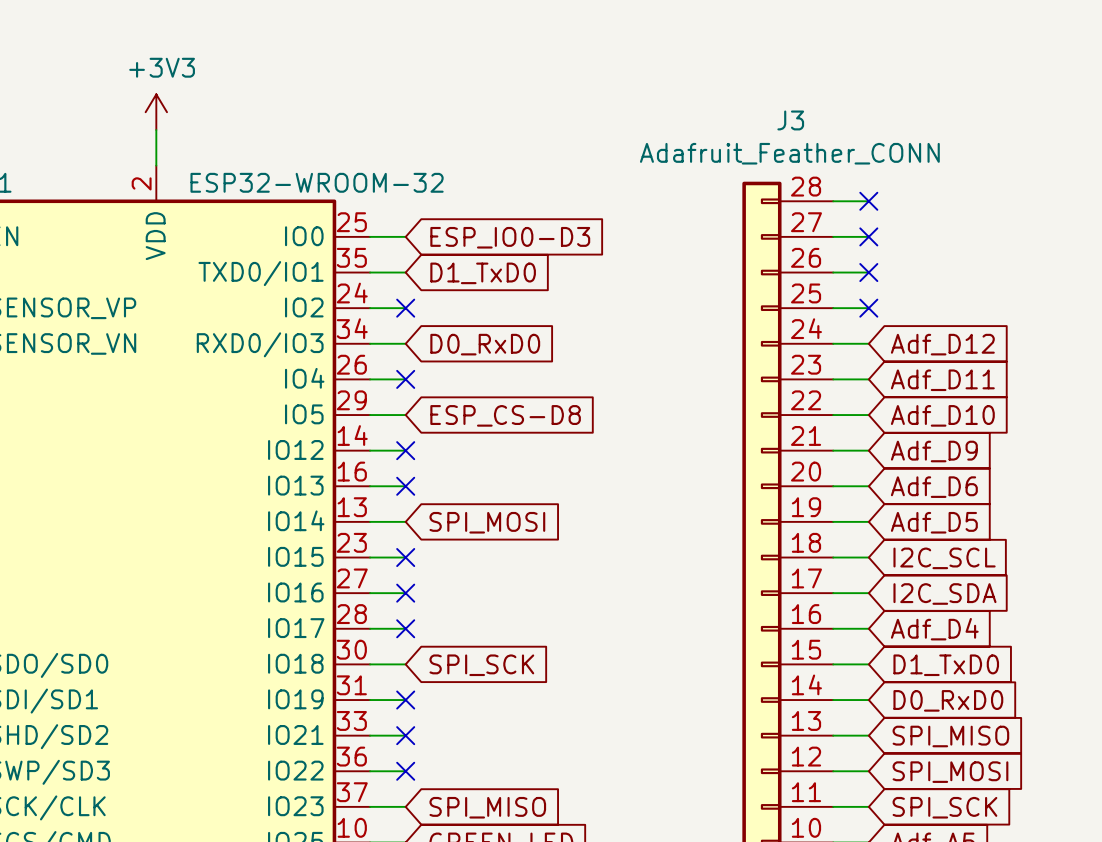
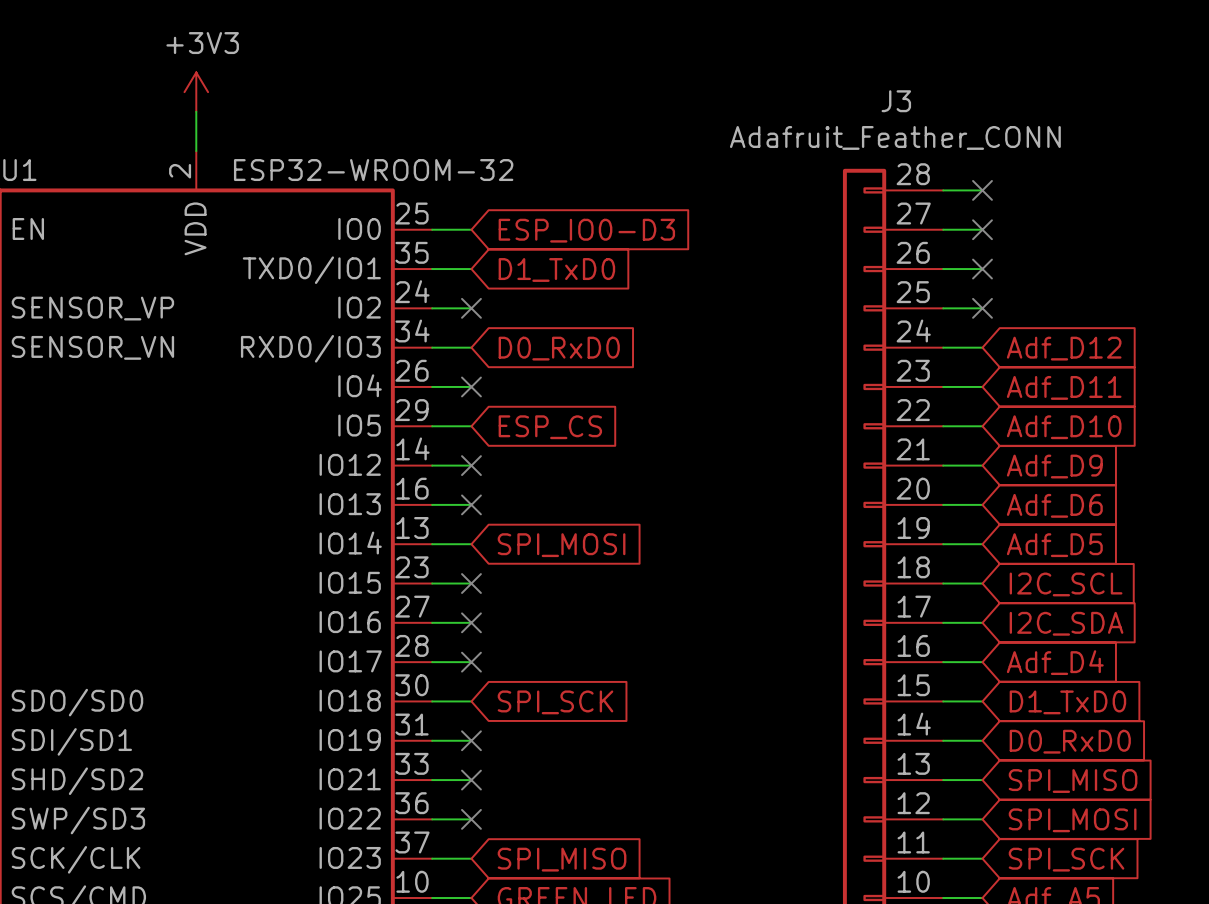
global label: ESP_CS-D8 (505, 415) -> ESP_CS (550, 427)

